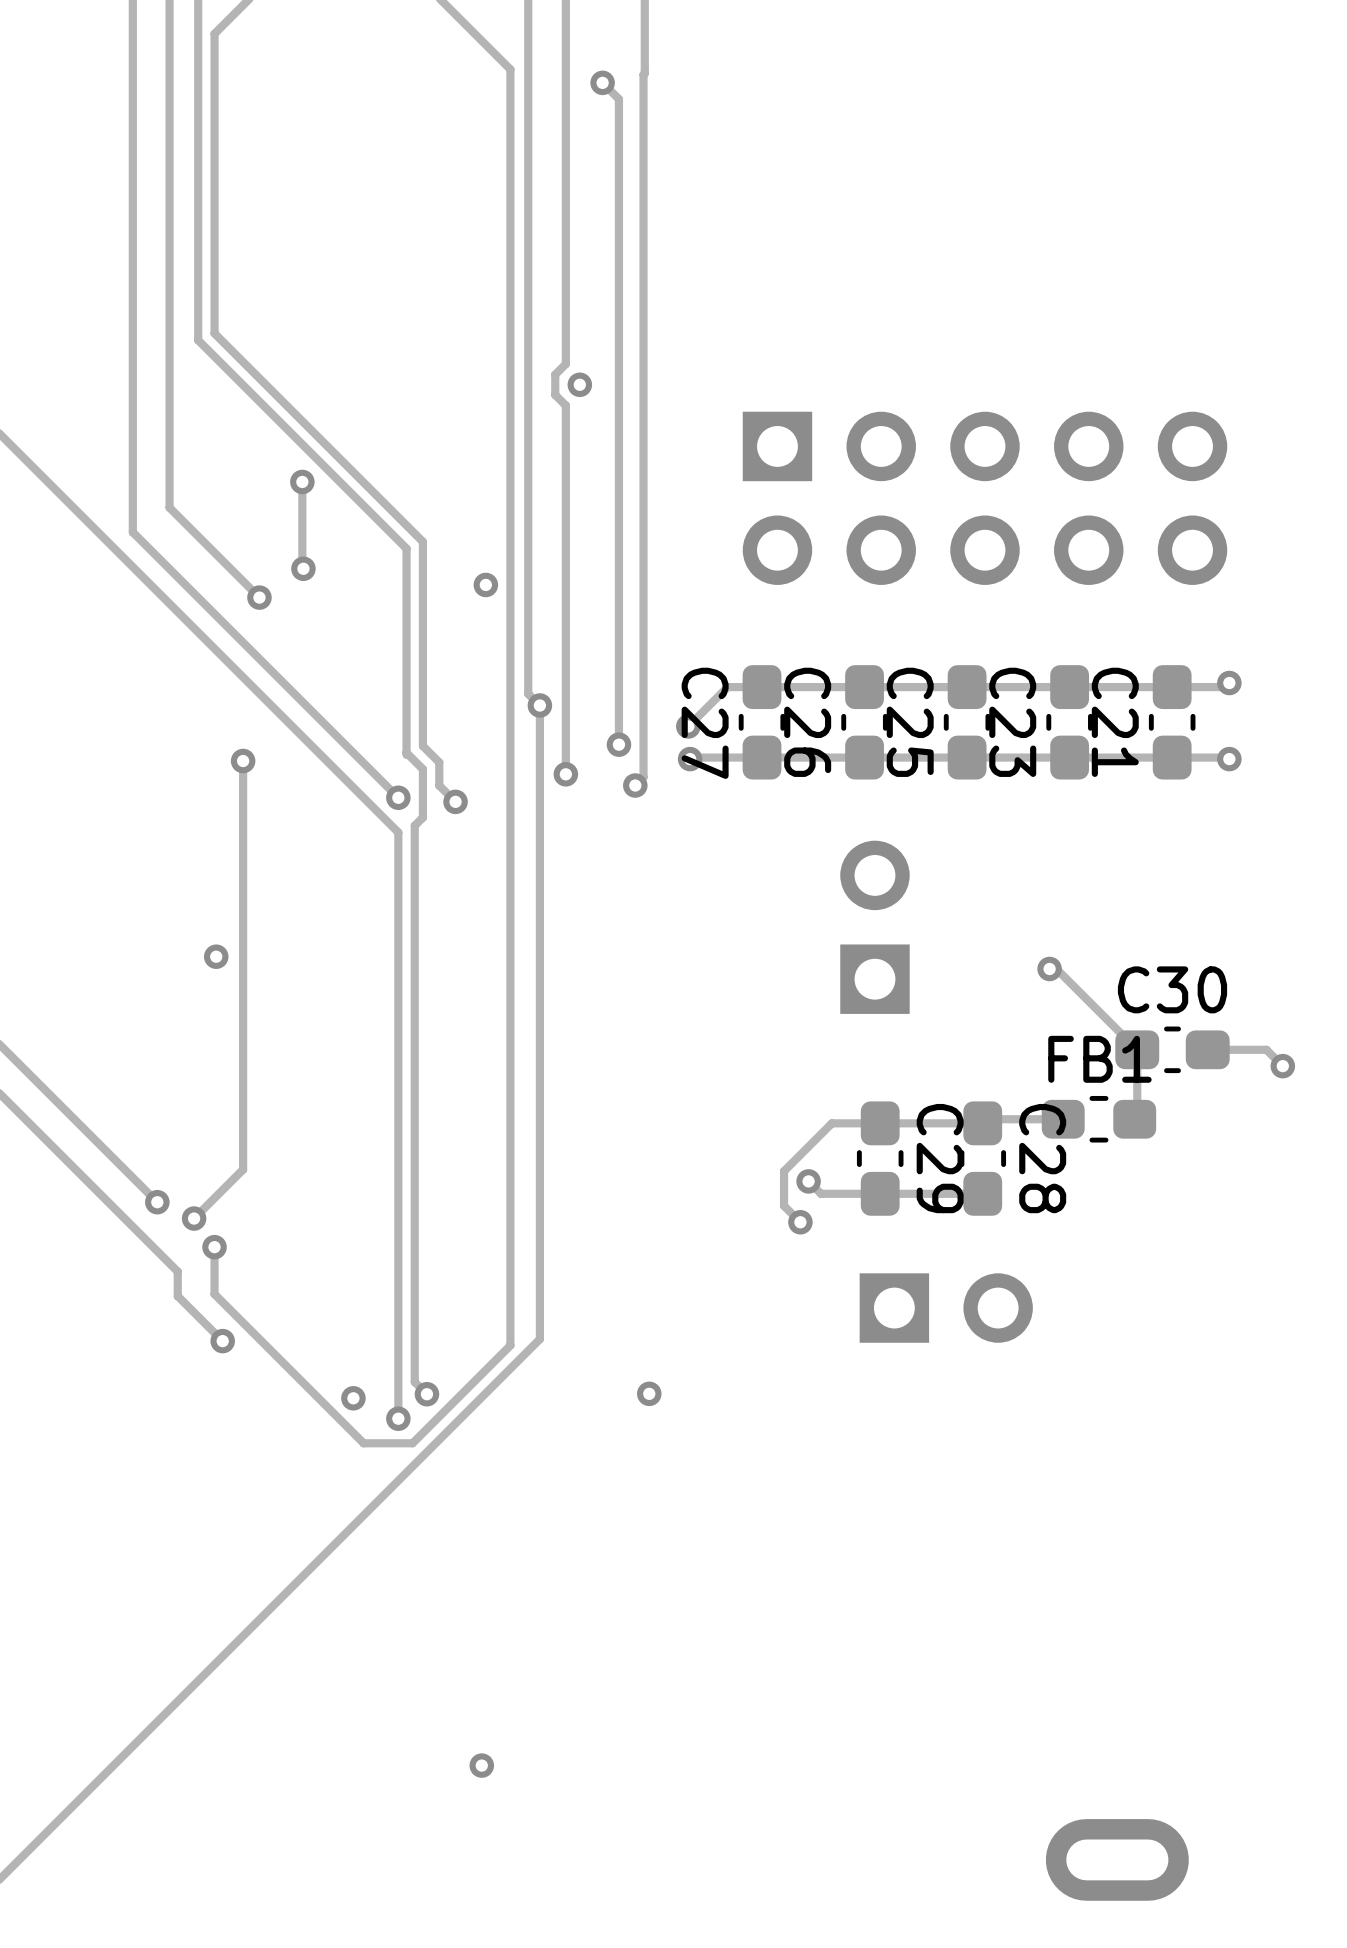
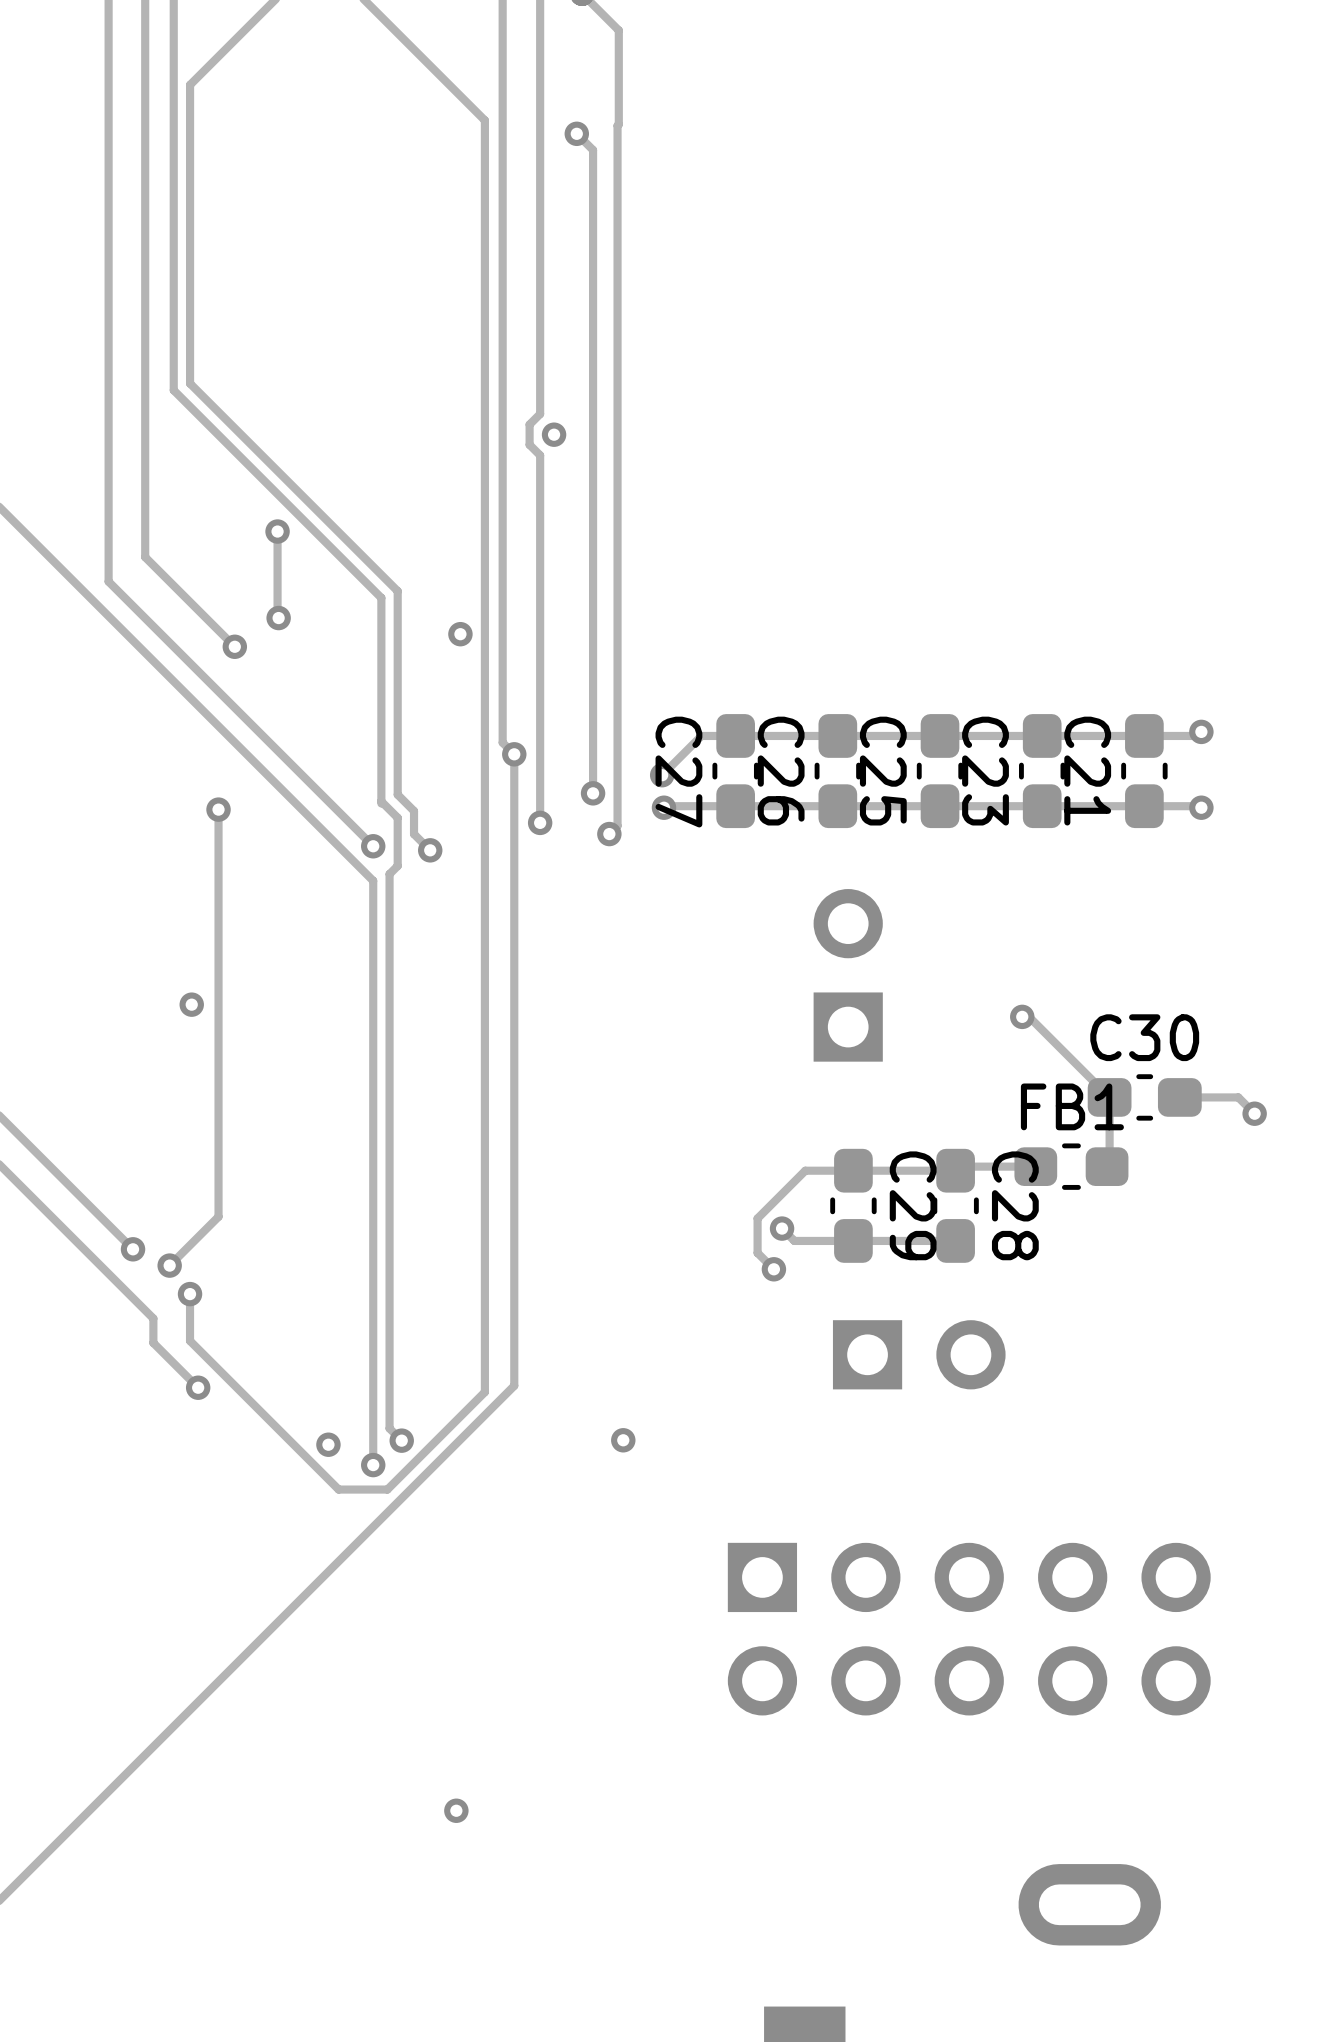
part: (984, 498) -> none
part: none -> (969, 1629)

